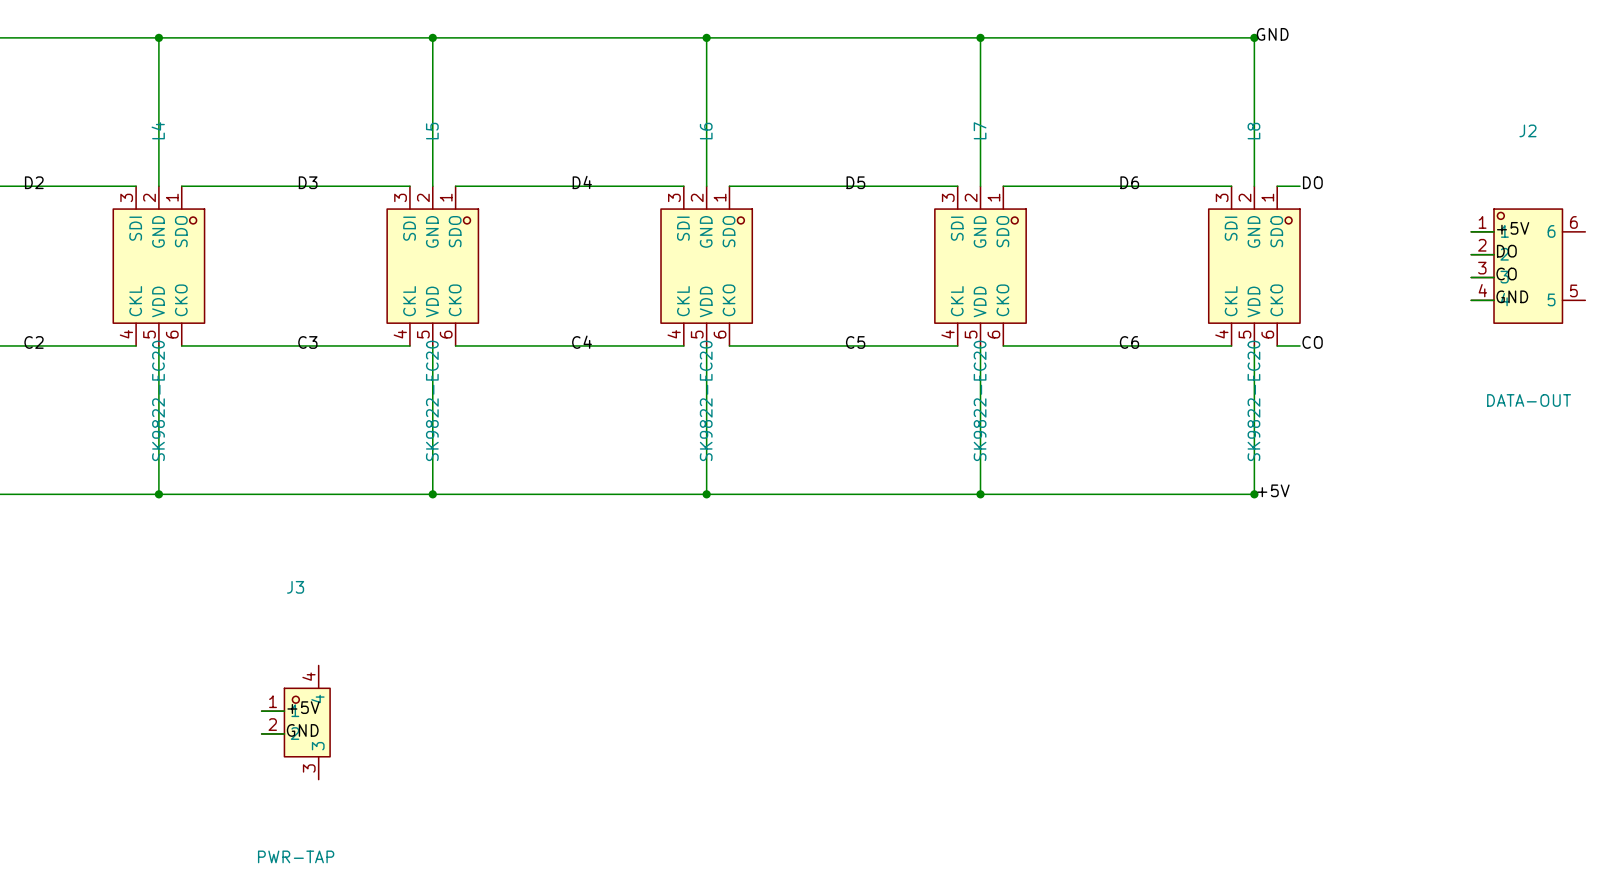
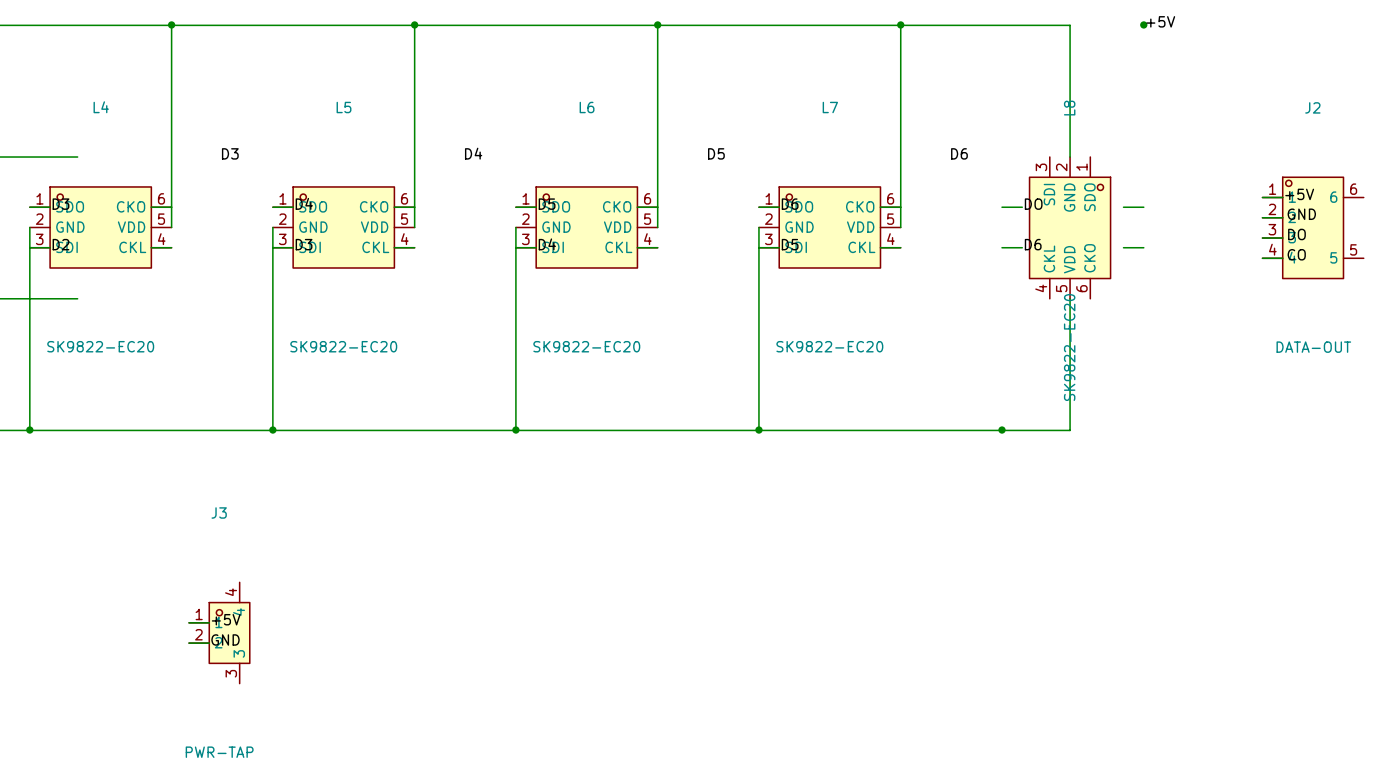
label: none -> +5V (1160, 21)
label: GND (1272, 34) -> none
wire: (158, 37) (158, 186) -> none
junction: (158, 37) -> none
wire: none -> (171, 24) (171, 227)
junction: none -> (171, 24)
wire: (432, 37) (432, 186) -> none
junction: (432, 37) -> none
wire: none -> (414, 24) (414, 227)
junction: none -> (414, 24)
wire: (706, 37) (706, 186) -> none
junction: (706, 37) -> none
wire: none -> (657, 24) (657, 227)
junction: none -> (657, 24)
wire: (980, 37) (980, 186) -> none
junction: (980, 37) -> none
wire: none -> (900, 24) (900, 227)
junction: none -> (900, 24)
junction: (1254, 37) -> none
junction: none -> (1143, 24)
label: DO (1312, 182) -> none
wire: (181, 186) (409, 186) -> none
wire: (455, 186) (683, 186) -> none
wire: (729, 186) (957, 186) -> none
wire: (1003, 186) (1231, 186) -> none
wire: (1277, 186) (1300, 186) -> (1123, 207) (1143, 207)
label: none -> D3 (61, 204)
label: none -> D4 (304, 203)
label: none -> D5 (547, 204)
label: none -> D6 (790, 204)
label: none -> DO (1033, 204)
wire: none -> (29, 207) (50, 207)
wire: none -> (151, 207) (171, 207)
wire: none -> (272, 207) (293, 207)
wire: none -> (394, 207) (414, 207)
wire: none -> (515, 207) (536, 207)
wire: none -> (637, 207) (657, 207)
wire: none -> (758, 207) (779, 207)
wire: none -> (880, 207) (900, 207)
wire: none -> (1002, 207) (1022, 207)
label position: DO (1506, 251) -> DO (1296, 234)
wire: none -> (29, 227) (29, 430)
wire: none -> (272, 227) (272, 430)
wire: none -> (515, 227) (515, 430)
wire: none -> (758, 227) (758, 430)
L4 rotation: 0° (158, 266) -> 90° counterclockwise (100, 227)
L5 rotation: 0° (432, 266) -> 90° counterclockwise (343, 227)
L6 rotation: 0° (706, 266) -> 90° counterclockwise (586, 227)
L7 rotation: 0° (980, 266) -> 90° counterclockwise (829, 227)
label position: CO (1506, 274) -> CO (1296, 254)
label: none -> D2 (61, 244)
label: none -> D3 (304, 244)
label: none -> D4 (547, 244)
label: none -> D5 (790, 244)
label: none -> D6 (1033, 244)
wire: none -> (29, 247) (50, 247)
wire: none -> (151, 247) (171, 247)
wire: none -> (272, 247) (293, 247)
wire: none -> (394, 247) (414, 247)
wire: none -> (515, 247) (536, 247)
wire: none -> (637, 247) (657, 247)
wire: none -> (758, 247) (779, 247)
wire: none -> (880, 247) (900, 247)
wire: none -> (1002, 247) (1022, 247)
label position: GND (1512, 296) -> GND (1301, 214)
label: C3 (307, 342) -> none
label: C4 (582, 342) -> none
label: C5 (855, 342) -> none
label: C6 (1129, 342) -> none
label: CO (1312, 342) -> none
wire: (158, 345) (158, 494) -> none
wire: (181, 345) (409, 345) -> none
wire: (432, 345) (432, 494) -> none
wire: (455, 345) (683, 345) -> none
wire: (706, 345) (706, 494) -> none
wire: (729, 345) (957, 345) -> none
wire: (980, 345) (980, 494) -> none
wire: (1003, 345) (1231, 345) -> none
wire: (1277, 345) (1300, 345) -> (1123, 247) (1143, 247)
label: +5V (1273, 490) -> none
junction: none -> (29, 430)
junction: none -> (272, 430)
junction: none -> (515, 430)
junction: none -> (758, 430)
junction: none -> (1002, 430)
junction: (158, 494) -> none
junction: (432, 494) -> none
junction: (706, 494) -> none
junction: (980, 494) -> none
junction: (1254, 494) -> none

